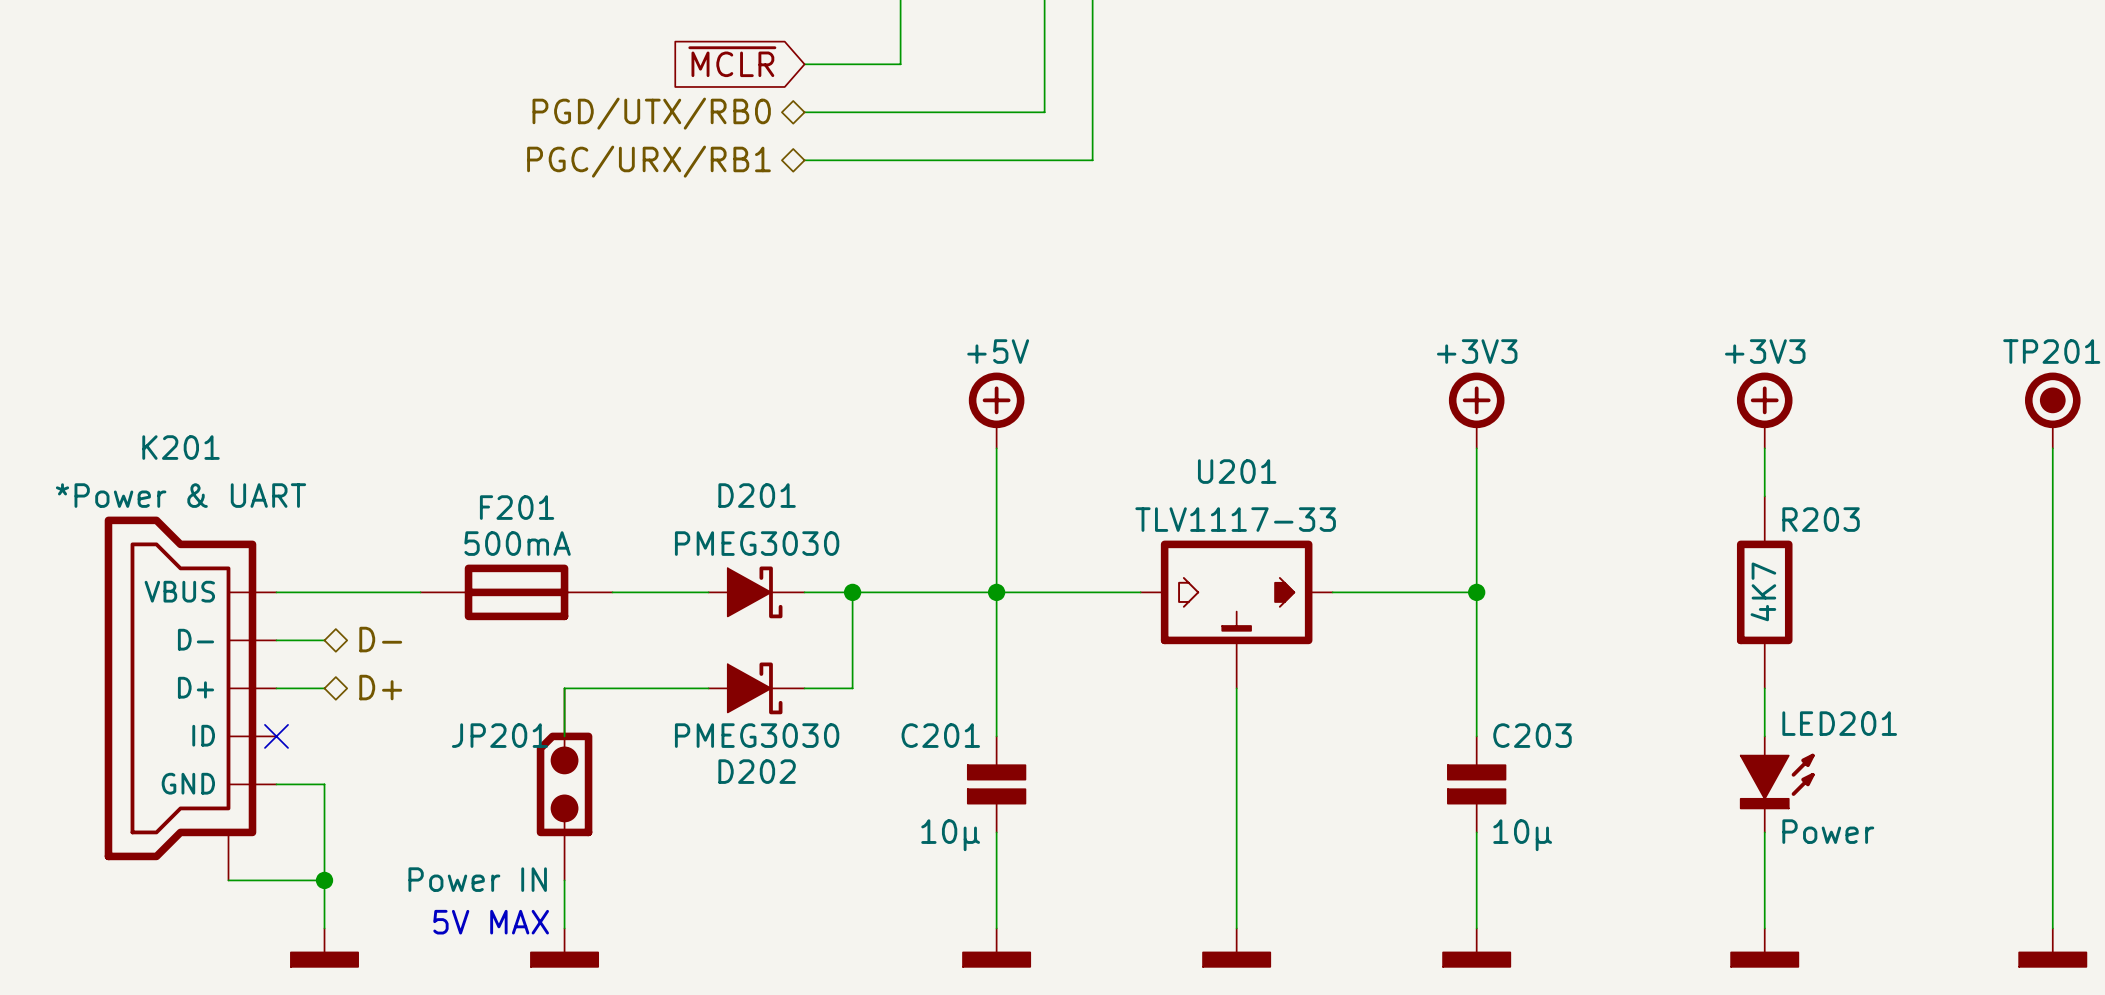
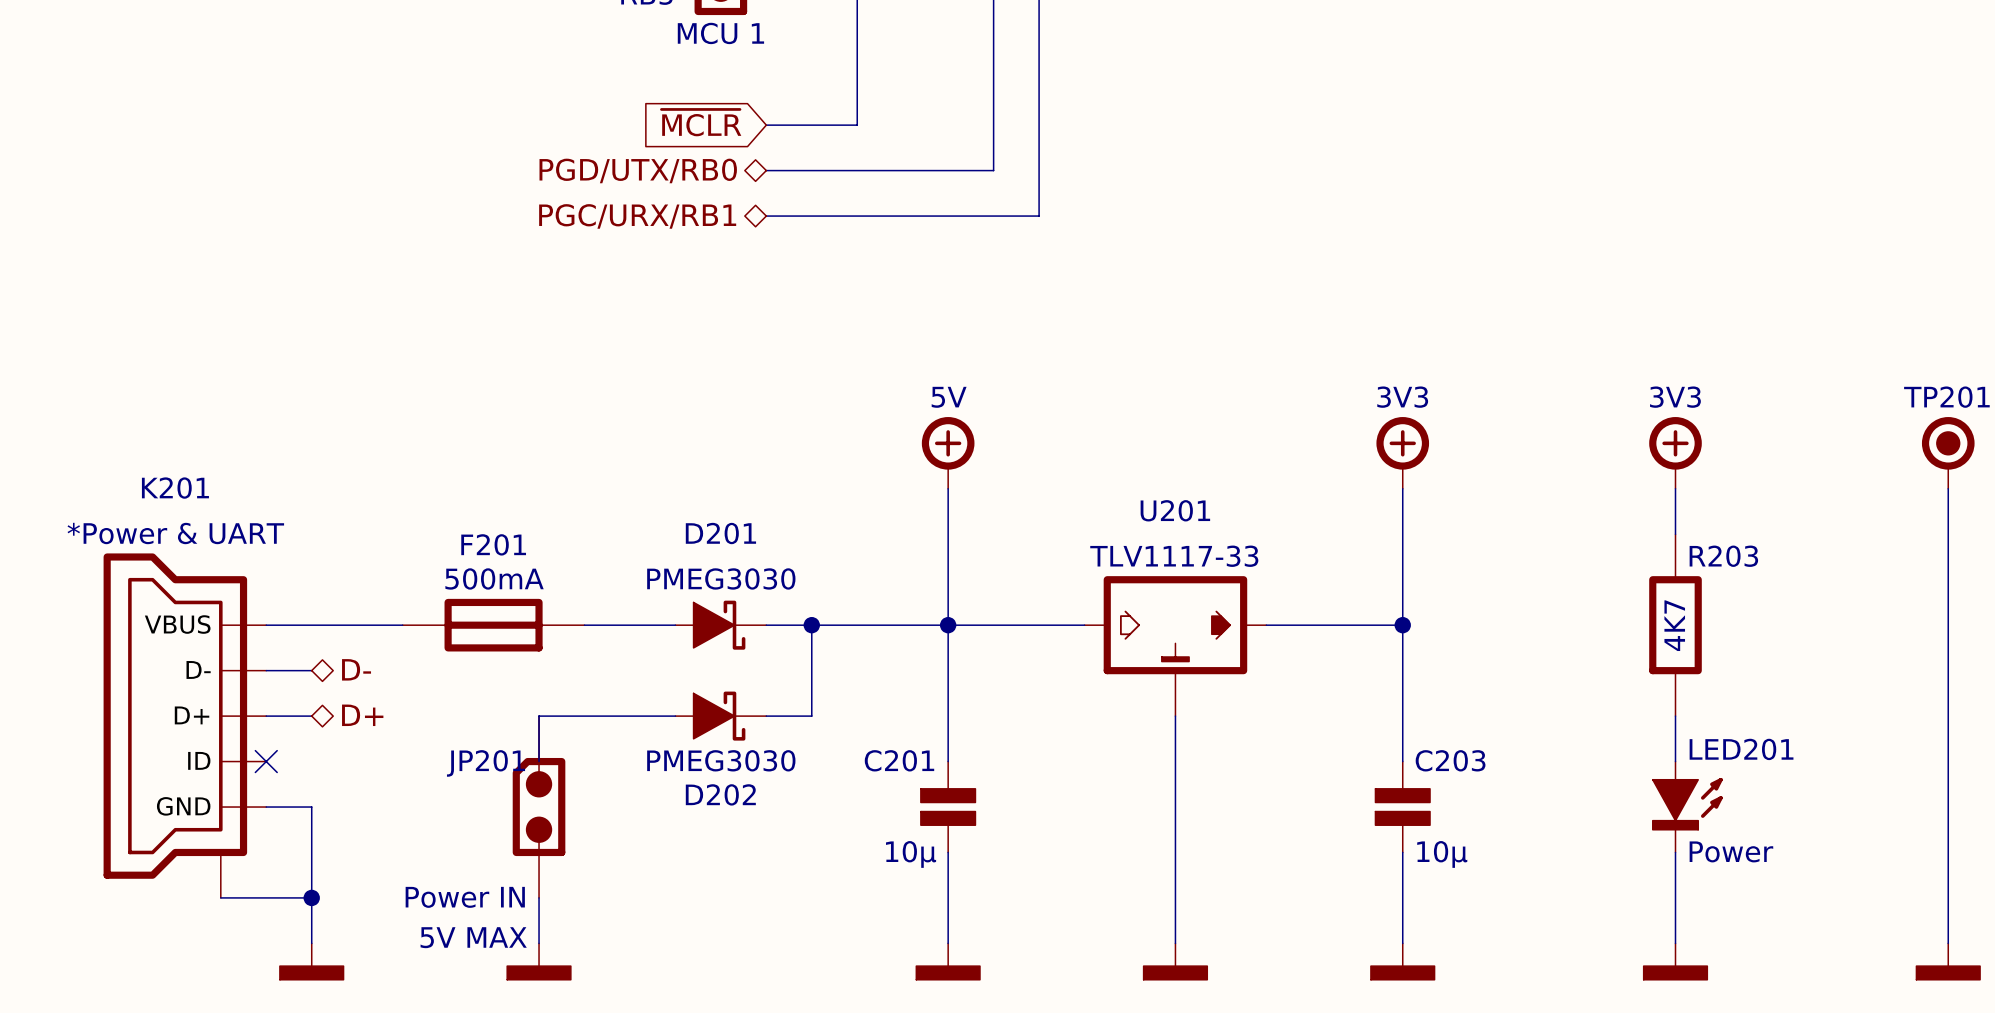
power symbol text: +5V (998, 351) -> 5V (949, 397)
power symbol text: +3V3 (1477, 351) -> 3V3 (1402, 397)
power symbol text: +3V3 (1765, 351) -> 3V3 (1675, 397)

